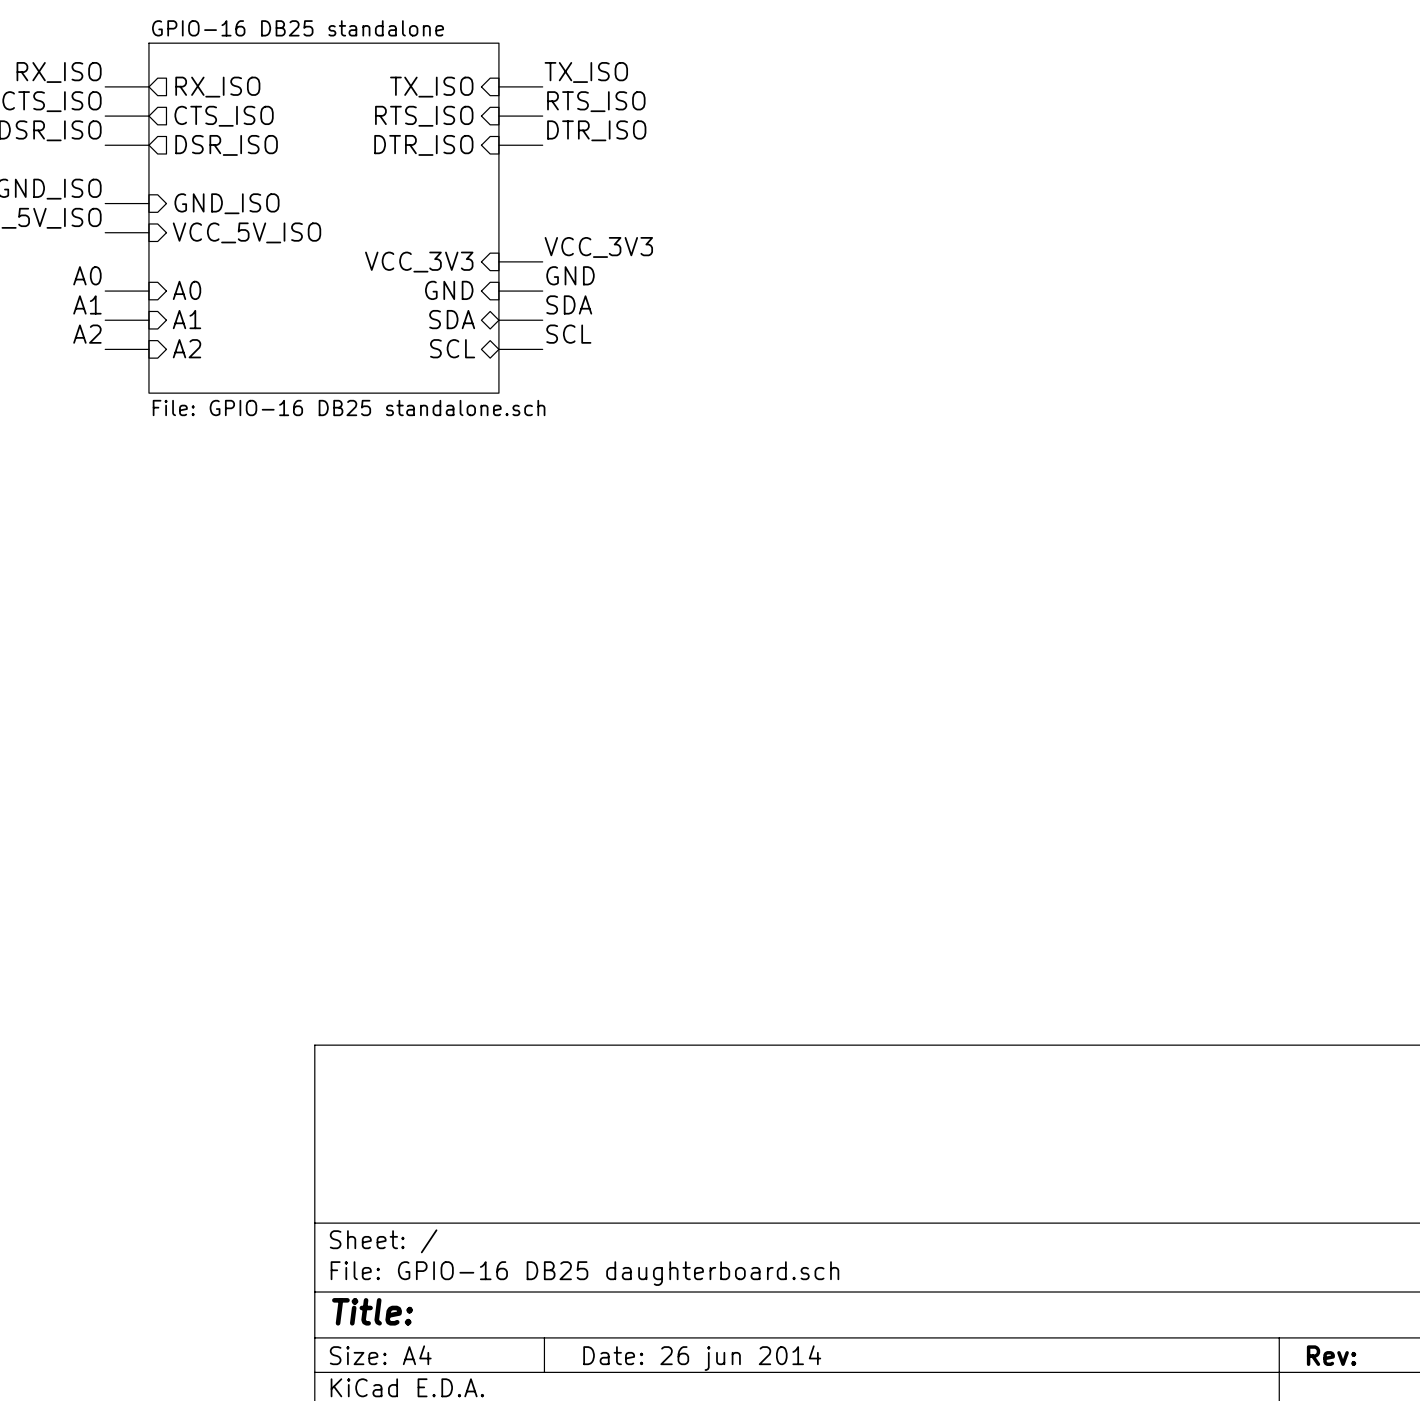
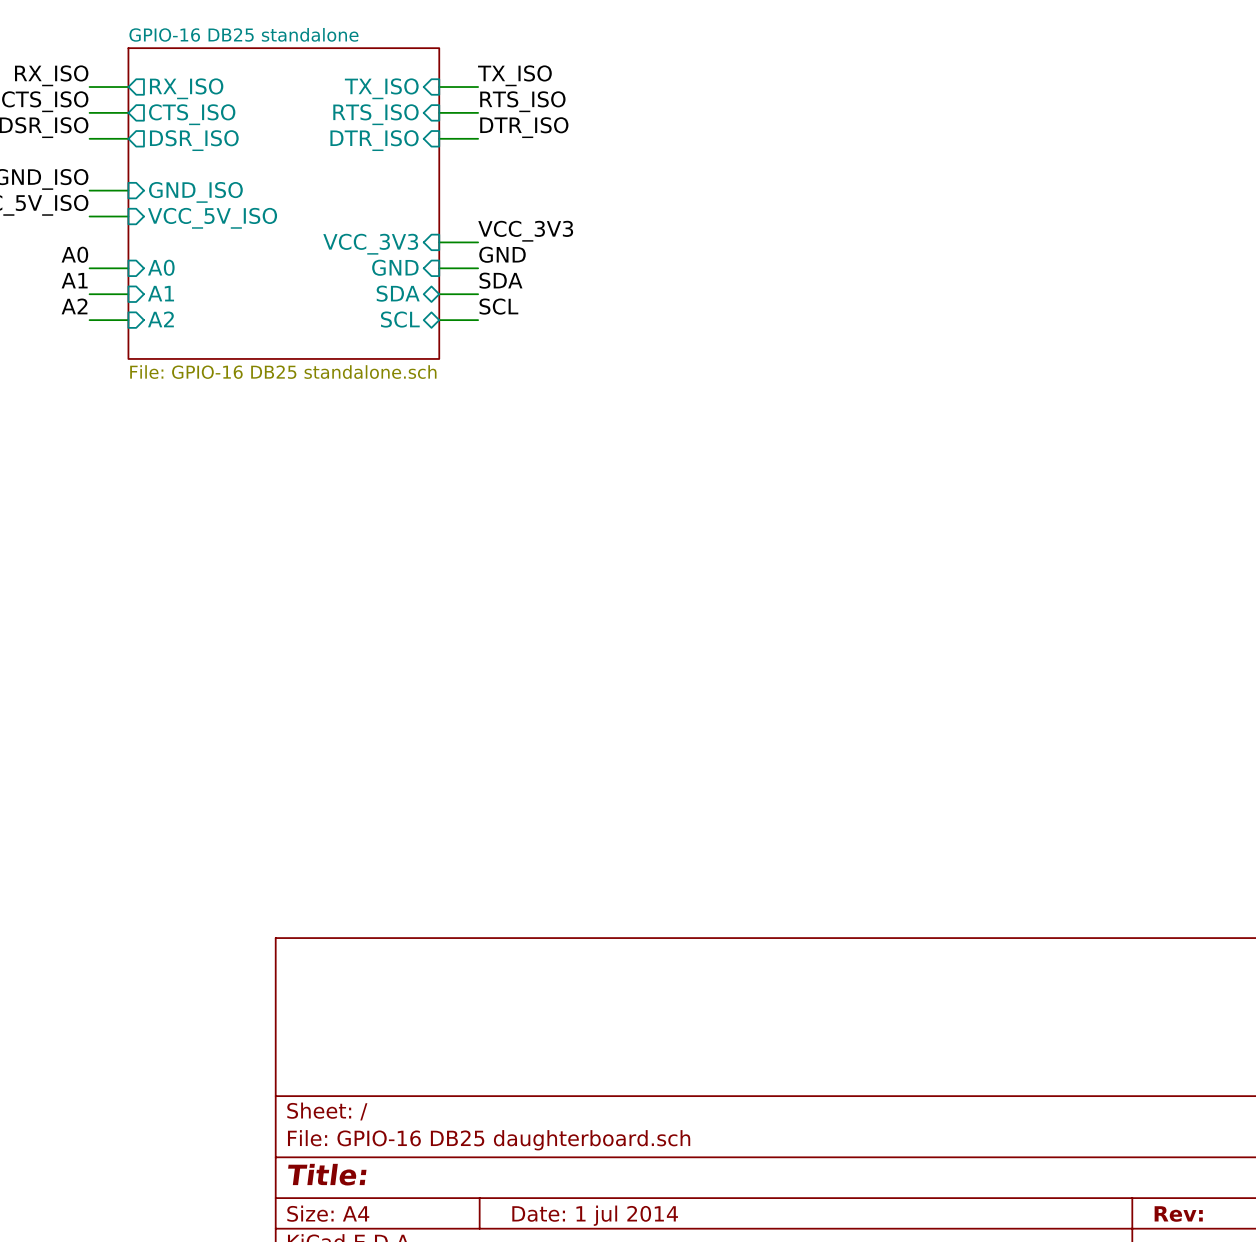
title block: Date: 26 jun 2014 (702, 1358) -> Date: 1 jul 2014 (595, 1215)

